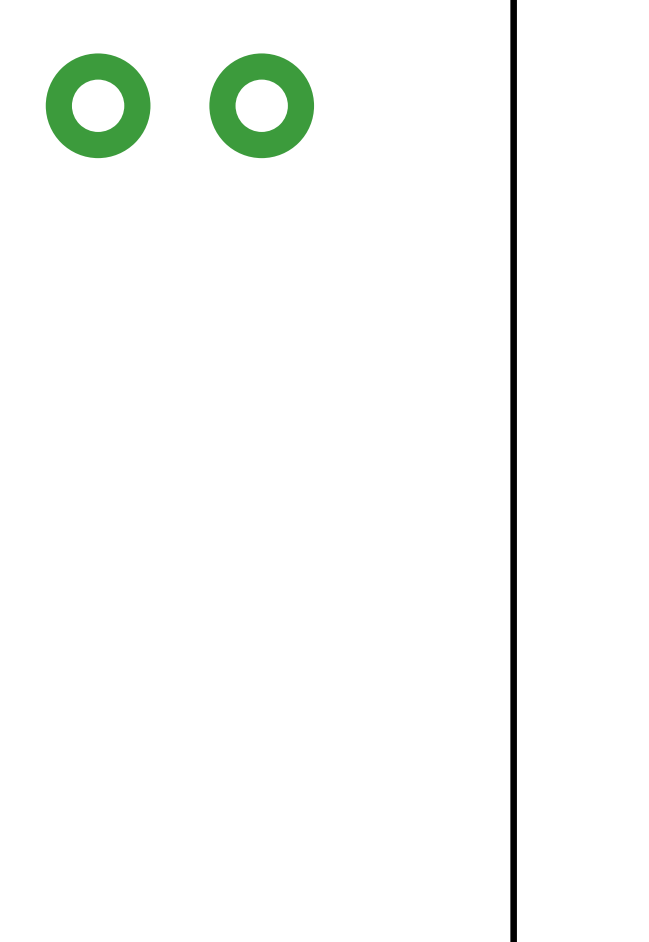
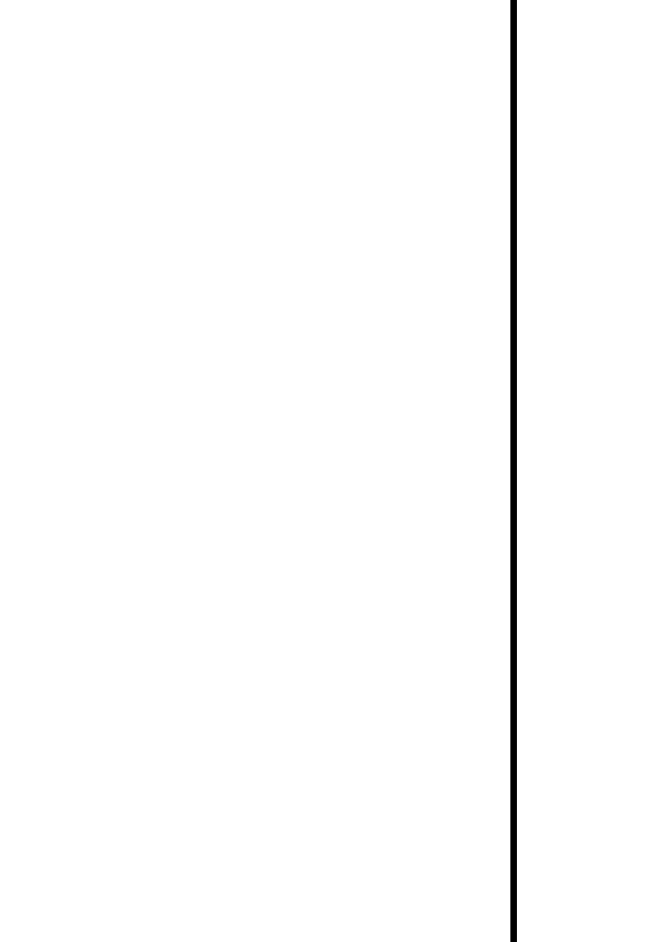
part: (179, 105) -> none

